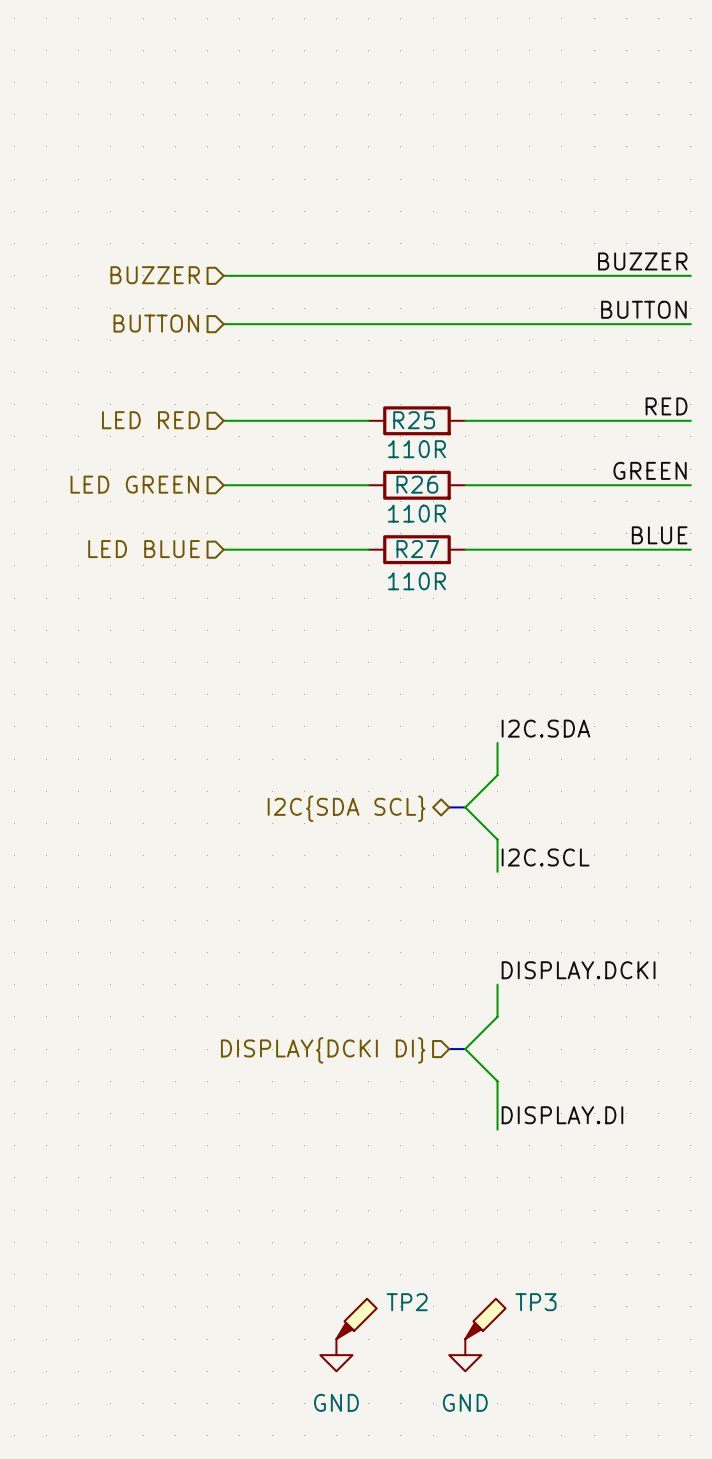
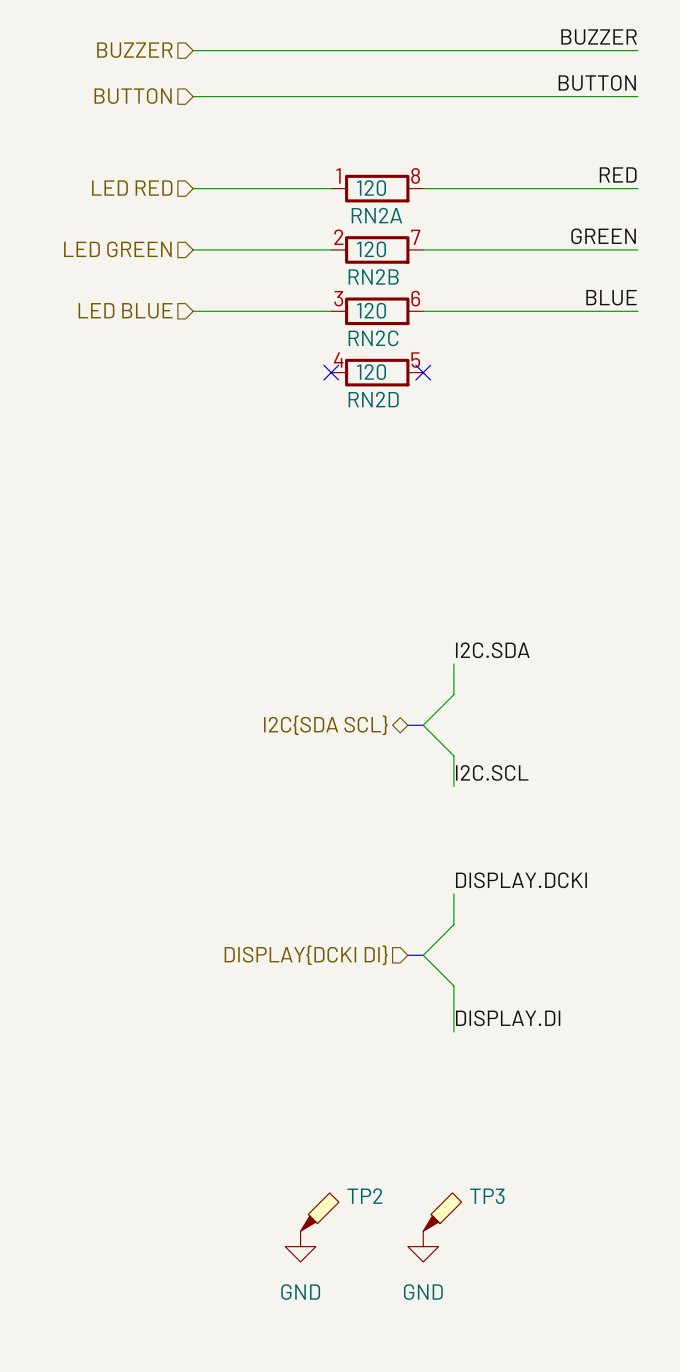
RN2A: none -> 120 (377, 188)
label position: BUZZER (642, 261) -> BUZZER (599, 37)
hierarchical label position: BUZZER (155, 275) -> BUZZER (134, 50)
wire: (223, 275) (690, 275) -> (193, 50) (637, 50)
RN2B: none -> 120 (377, 249)
label position: BUTTON (643, 309) -> BUTTON (597, 82)
hierarchical label position: BUTTON (156, 323) -> BUTTON (133, 96)
wire: (223, 324) (690, 324) -> (193, 96) (637, 96)
RN2C: none -> 120 (377, 311)
label position: RED (666, 406) -> RED (618, 174)
hierarchical label position: LED RED (150, 420) -> LED RED (132, 188)
wire: (223, 420) (368, 420) -> (193, 188) (331, 188)
R25: 110R (416, 420) -> none
wire: (465, 420) (690, 420) -> (423, 188) (637, 188)
no-connect mark: none -> (331, 372)
RN2D: none -> 120 (377, 372)
no-connect mark: none -> (423, 372)
label position: GREEN (650, 470) -> GREEN (603, 236)
hierarchical label position: LED GREEN (134, 484) -> LED GREEN (117, 249)
wire: (223, 485) (368, 485) -> (193, 249) (331, 249)
R26: 110R (416, 485) -> none
wire: (465, 485) (690, 485) -> (423, 249) (637, 249)
label position: BLUE (659, 535) -> BLUE (611, 297)
hierarchical label position: LED BLUE (144, 549) -> LED BLUE (125, 310)
wire: (223, 549) (368, 549) -> (193, 311) (331, 311)
R27: 110R (416, 549) -> none
wire: (465, 549) (690, 549) -> (423, 311) (637, 311)

